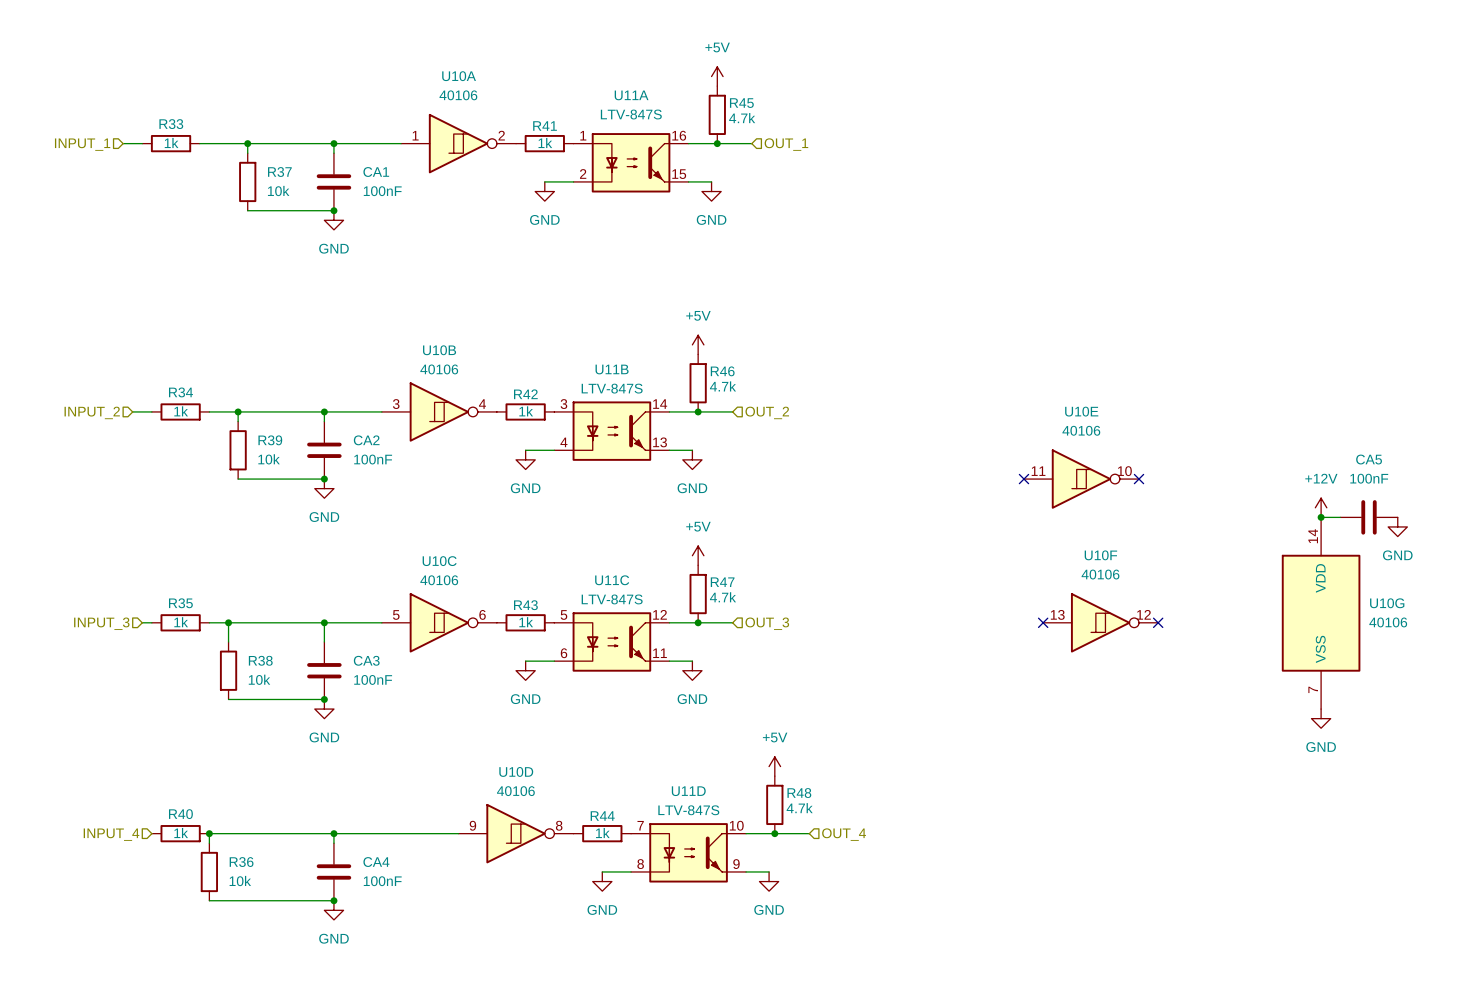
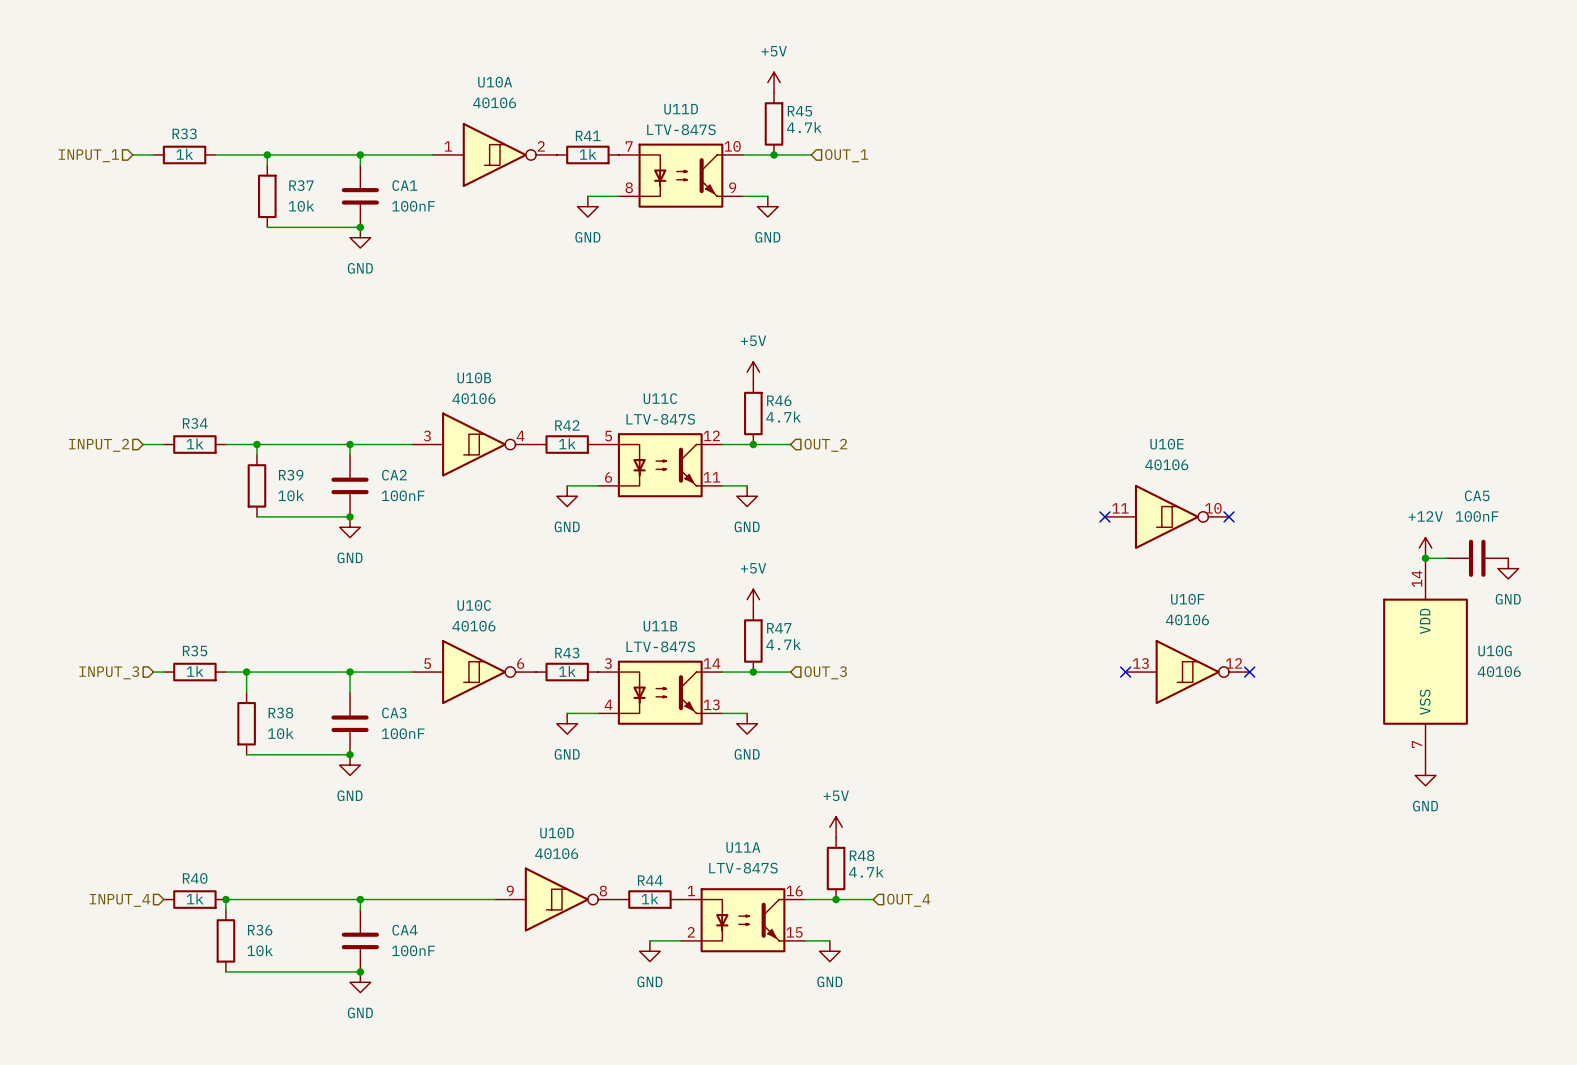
U11A position: (631, 162) -> (742, 920)
U11B position: (611, 431) -> (660, 692)
U11C position: (611, 641) -> (660, 465)
U11D position: (688, 852) -> (680, 175)

